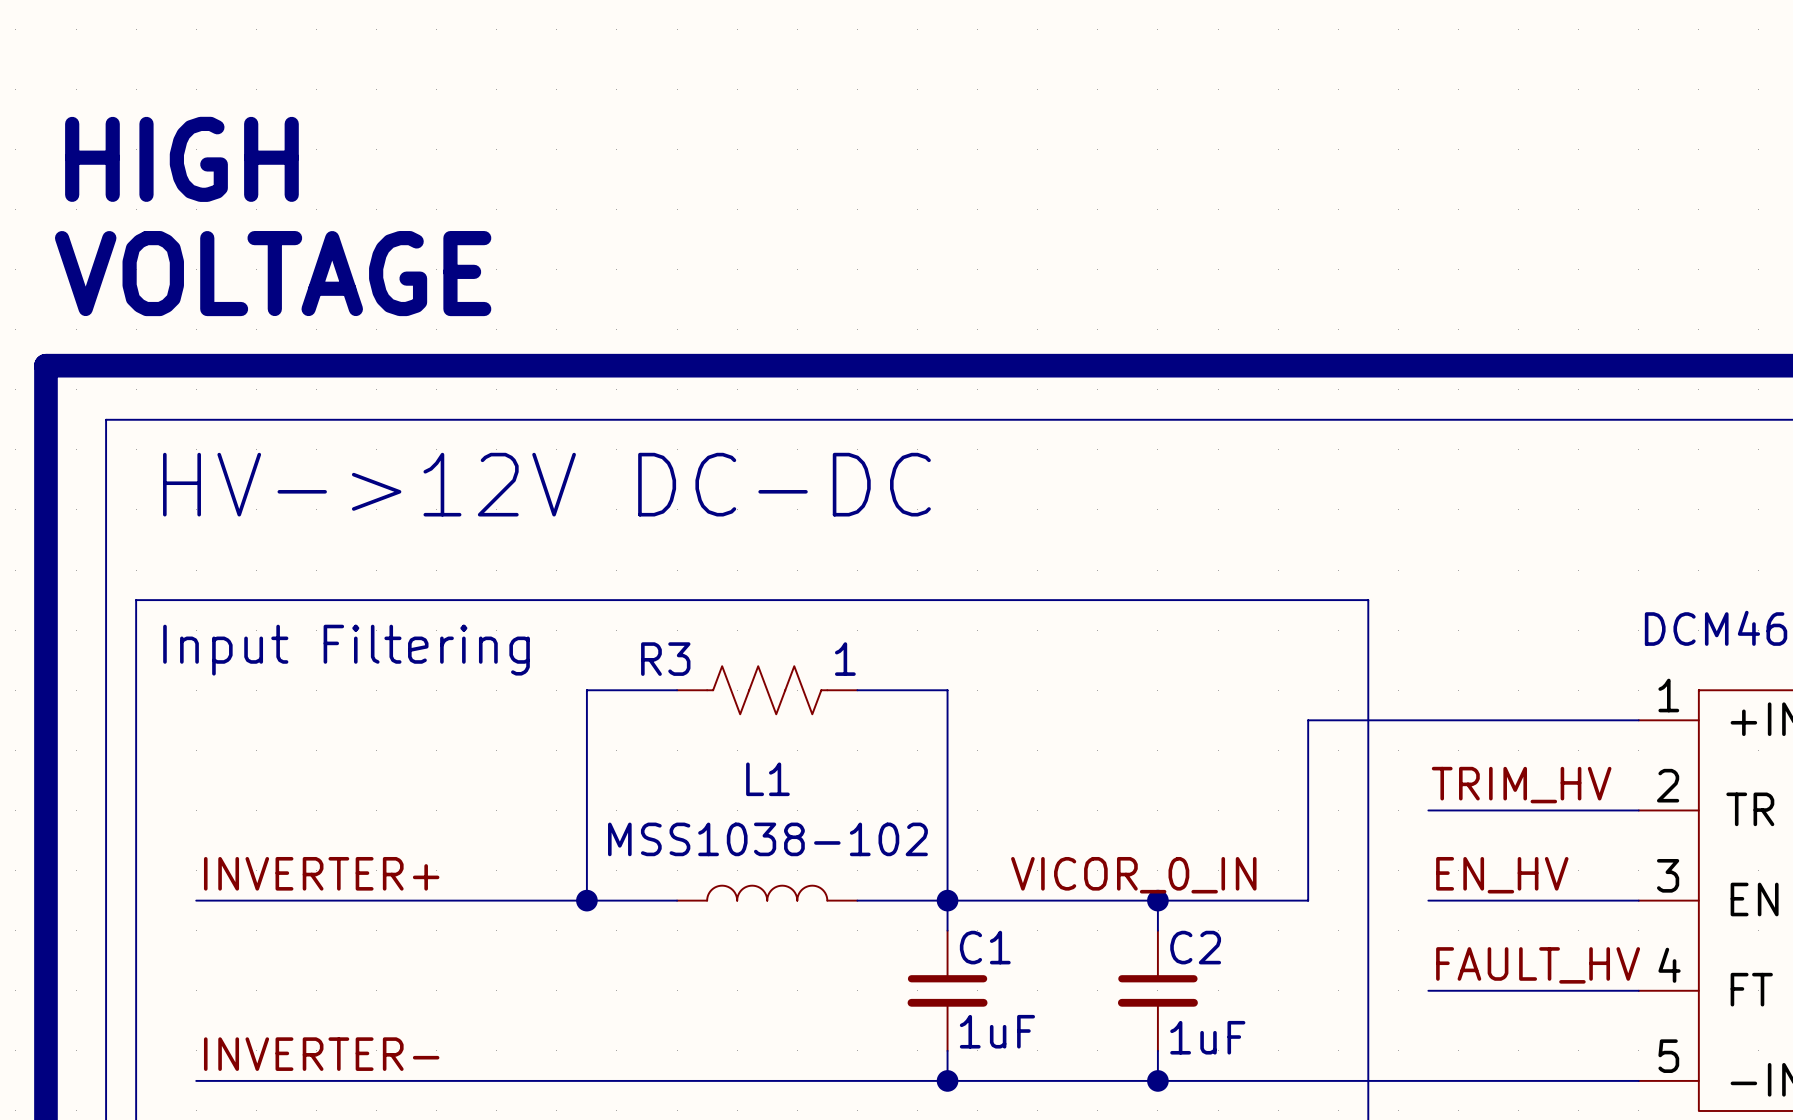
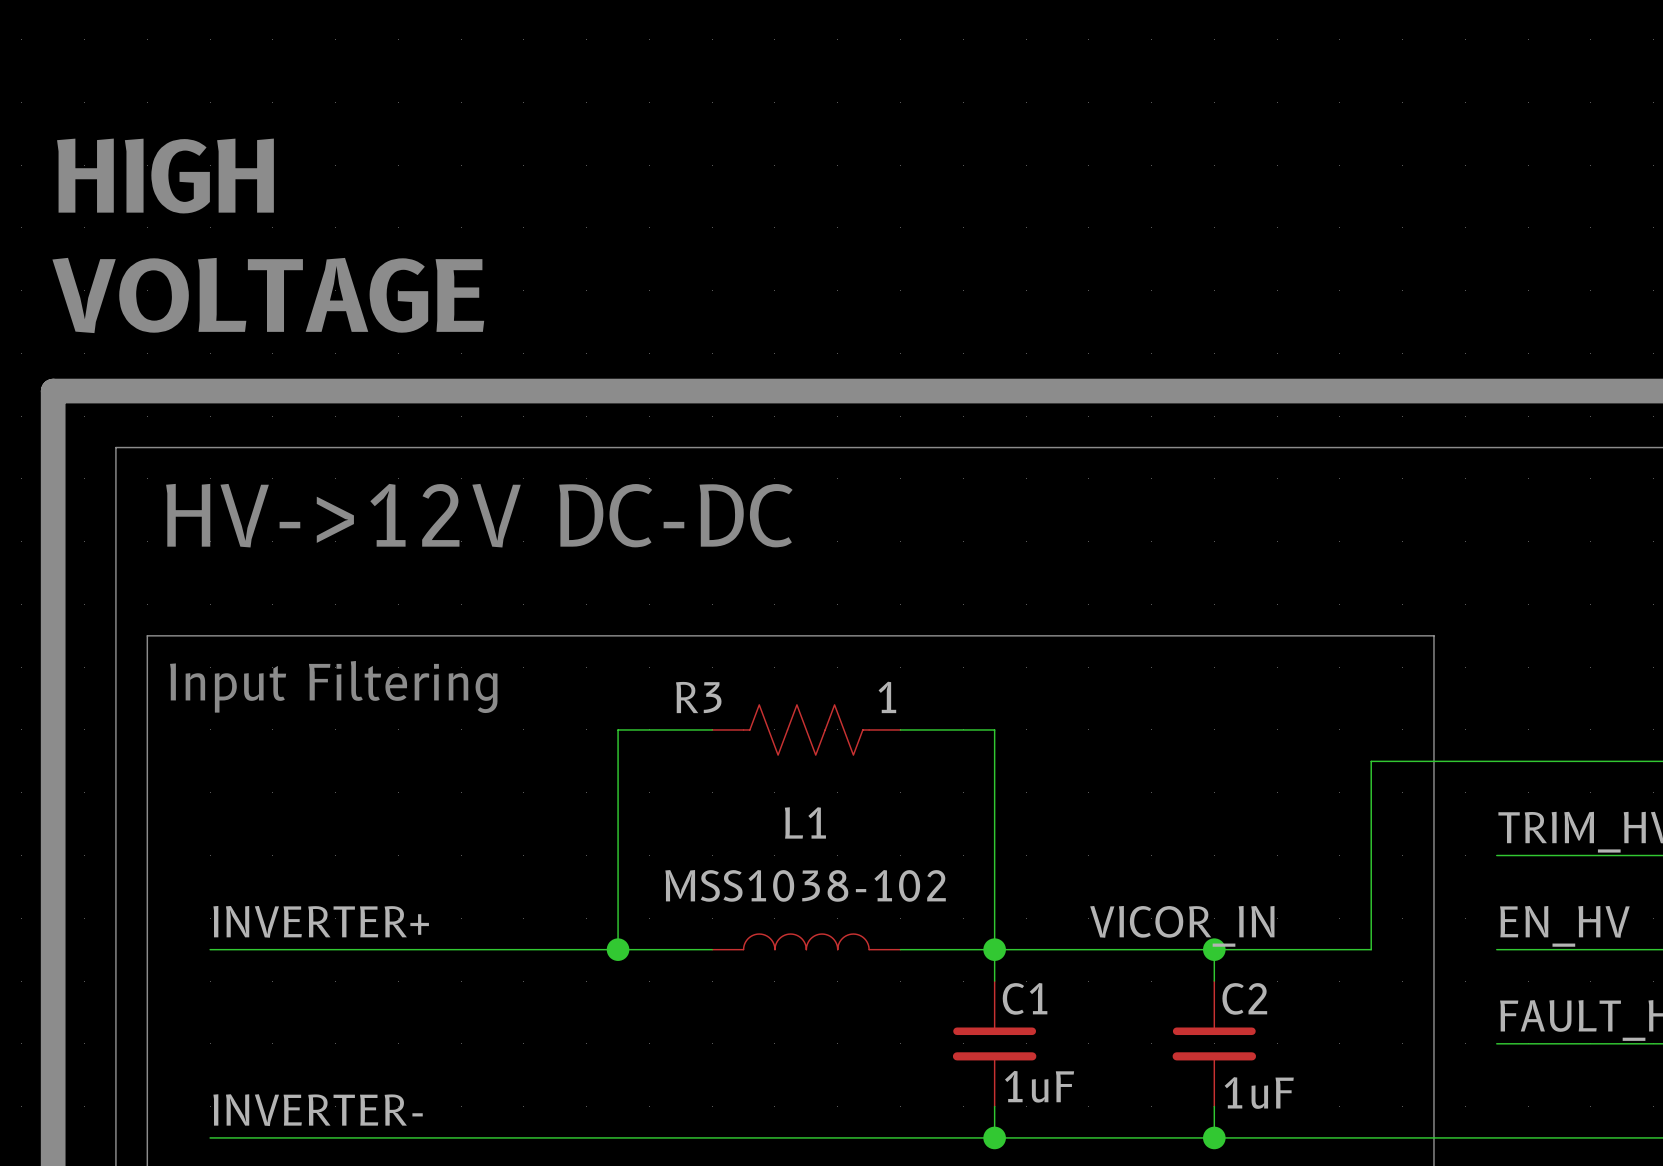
label: VICOR_0_IN (1133, 875) -> VICOR_IN (1182, 926)

